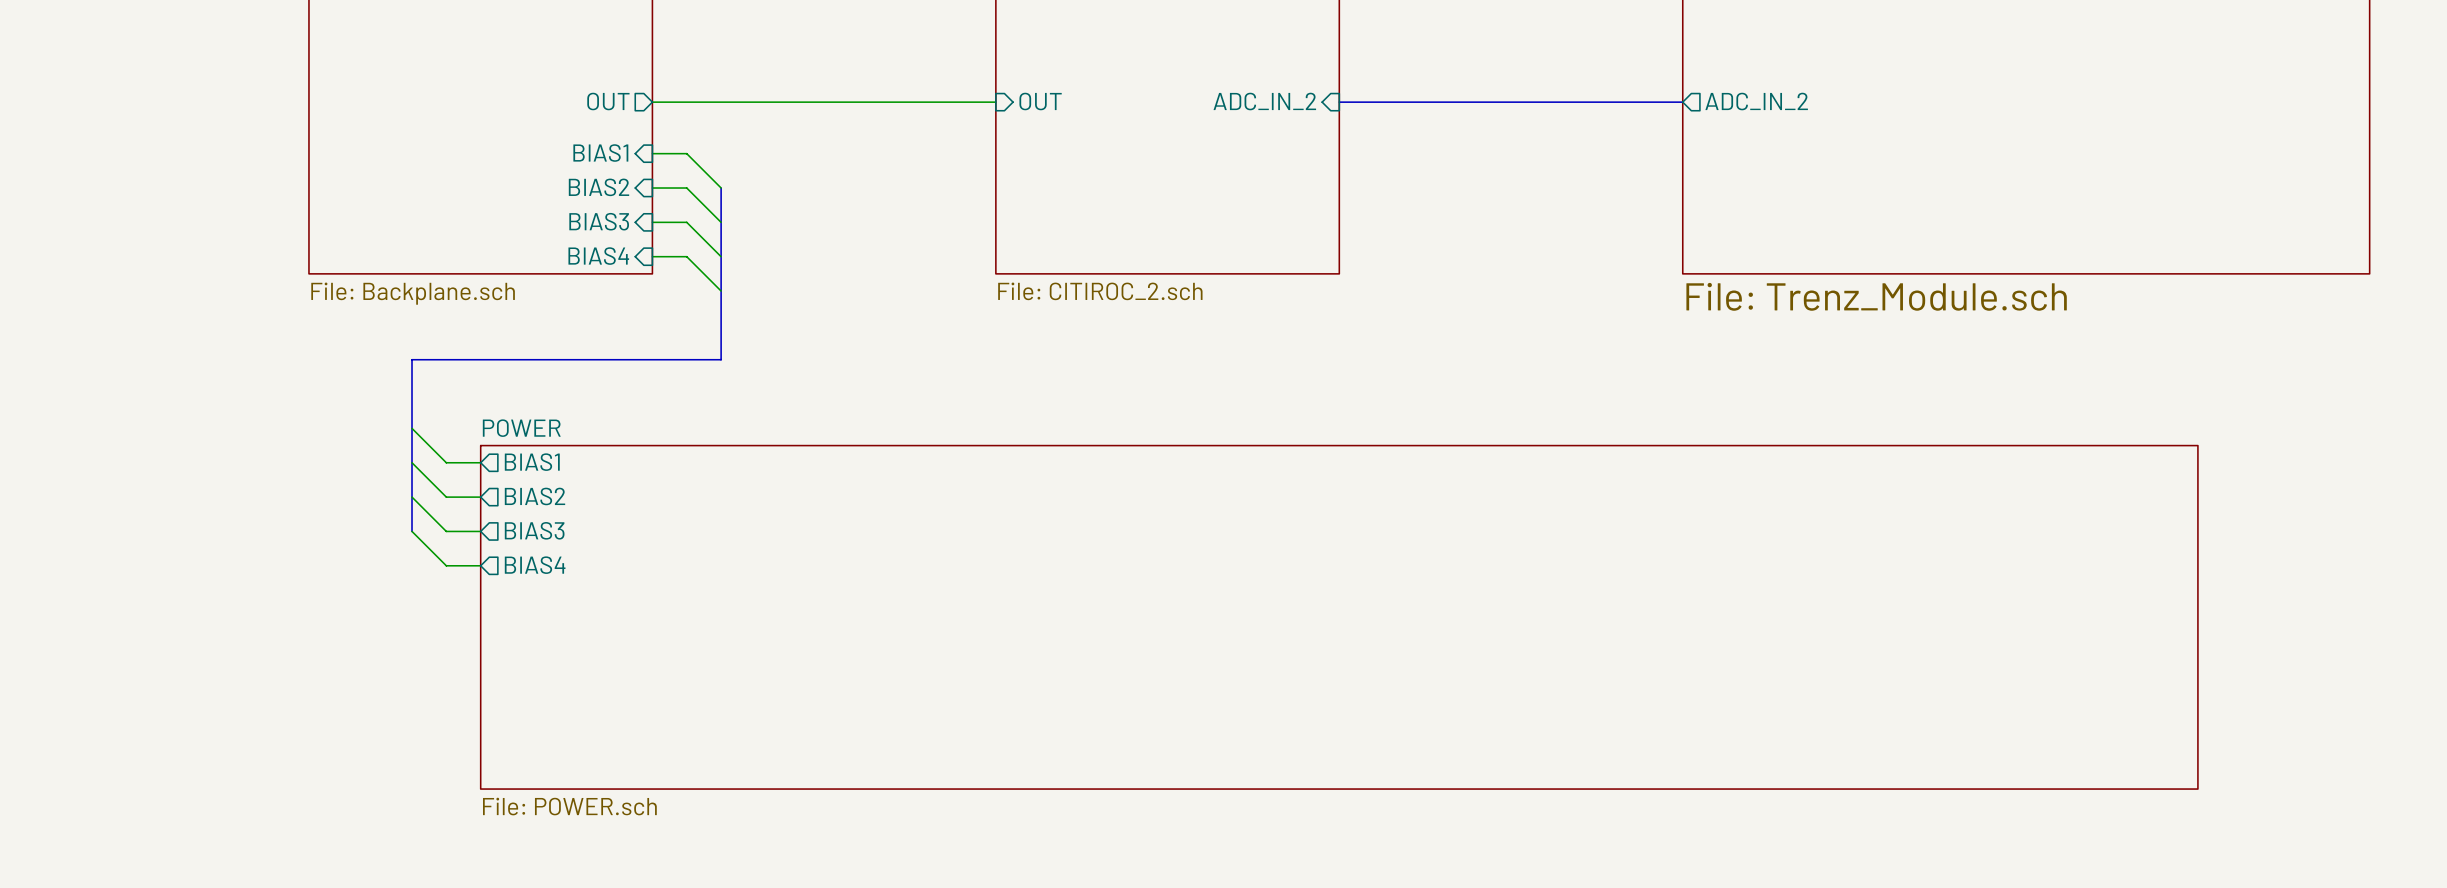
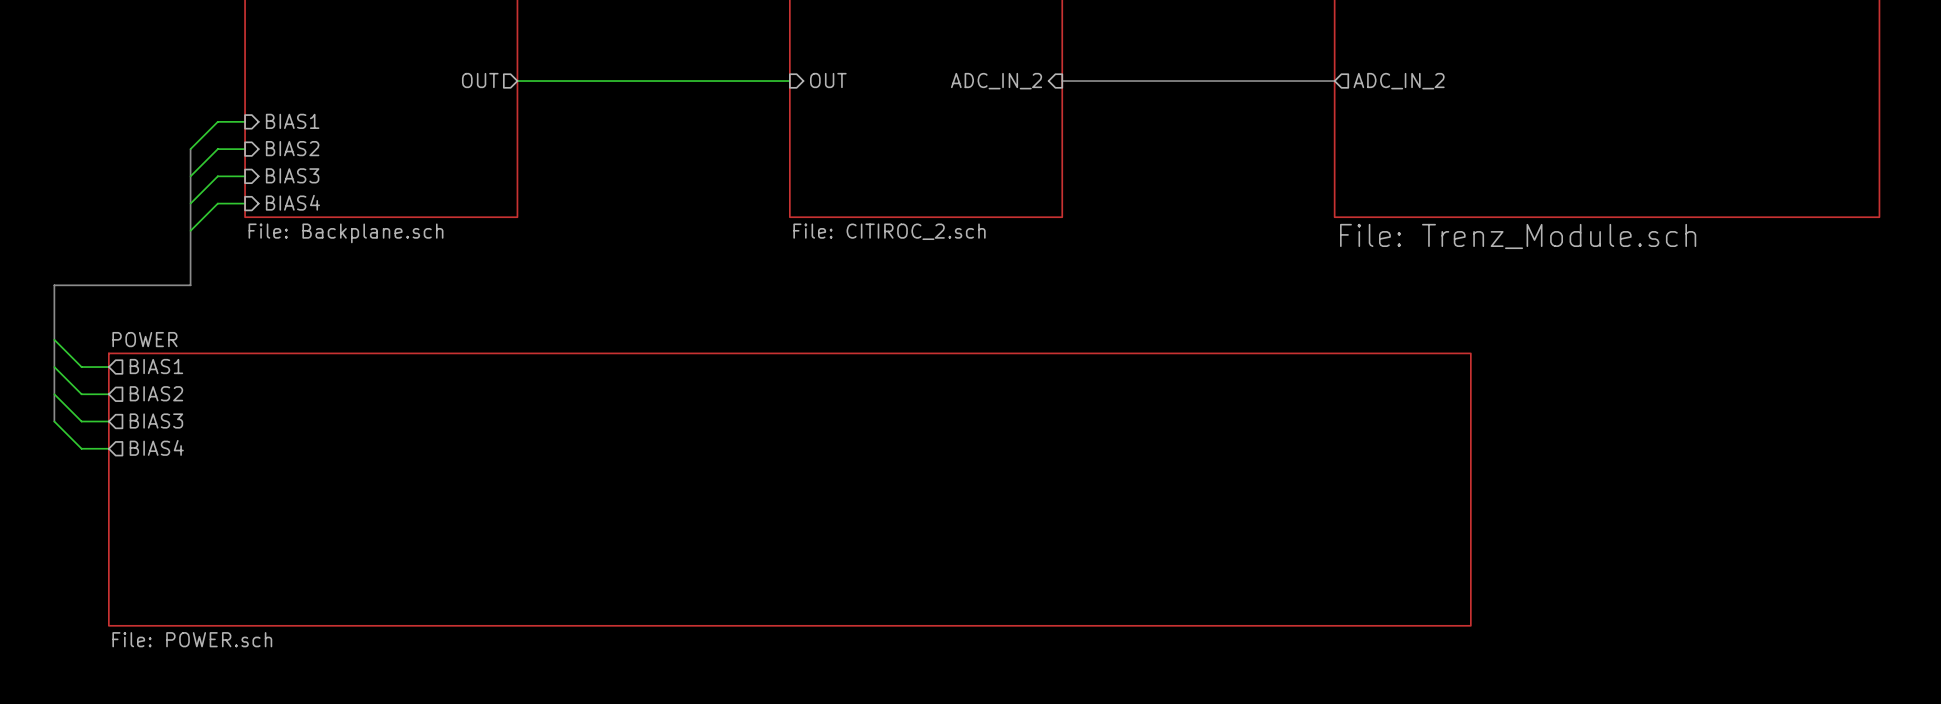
wire: none -> (245, 121) (217, 121) (190, 149)
sheet pin: none -> BIAS1 (292, 121)
sheet pin: BIAS1 (600, 153) -> none
wire: (652, 153) (686, 153) (721, 188) -> none
sheet pin: none -> BIAS2 (292, 148)
sheet pin: BIAS2 (599, 187) -> none
bus: none -> (190, 149) (190, 285) (54, 285) (54, 421)
wire: none -> (245, 149) (217, 149) (190, 176)
wire: (652, 188) (686, 188) (721, 222) -> none
bus: (721, 188) (721, 359) (412, 359) (412, 531) -> none
sheet pin: none -> BIAS3 (292, 175)
sheet pin: BIAS3 (599, 221) -> none
wire: none -> (245, 176) (217, 176) (190, 203)
wire: (652, 222) (686, 222) (721, 256) -> none
wire: none -> (245, 203) (217, 203) (190, 230)
sheet pin: none -> BIAS4 (292, 202)
sheet pin: BIAS4 (598, 256) -> none
wire: (652, 256) (686, 256) (721, 291) -> none
wire: none -> (54, 339) (81, 367) (108, 367)
wire: (412, 428) (446, 462) (480, 462) -> none
wire: none -> (54, 367) (81, 394) (108, 394)
sheet pin: none -> BIAS1 (156, 366)
wire: (412, 462) (446, 497) (480, 497) -> none
sheet pin: BIAS1 (532, 462) -> none
sheet pin: none -> BIAS2 (156, 393)
sheet pin: BIAS2 (534, 496) -> none
wire: none -> (54, 394) (81, 421) (108, 421)
wire: (412, 497) (446, 531) (480, 531) -> none
sheet pin: none -> BIAS3 (156, 421)
sheet pin: BIAS3 (534, 530) -> none
wire: none -> (54, 421) (81, 448) (108, 448)
wire: (412, 531) (446, 565) (480, 565) -> none
sheet pin: none -> BIAS4 (156, 447)
sheet pin: BIAS4 (535, 565) -> none
sheet POWER: none -> File: POWER.sch (789, 489)
sheet POWER: File: POWER.sch (1339, 617) -> none

